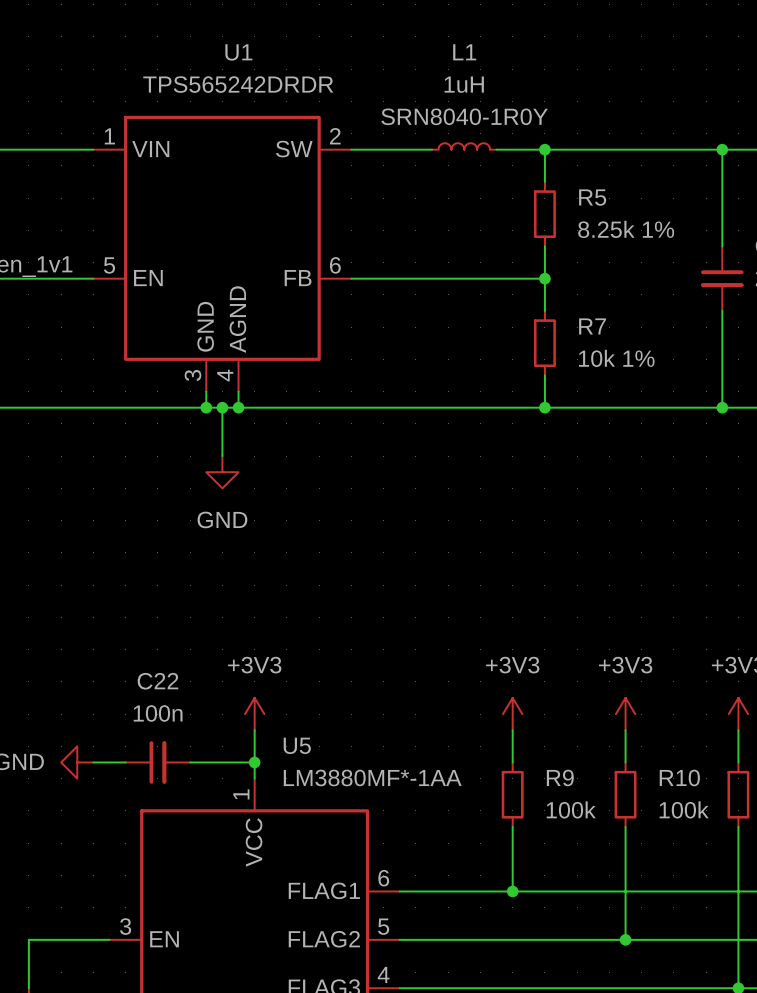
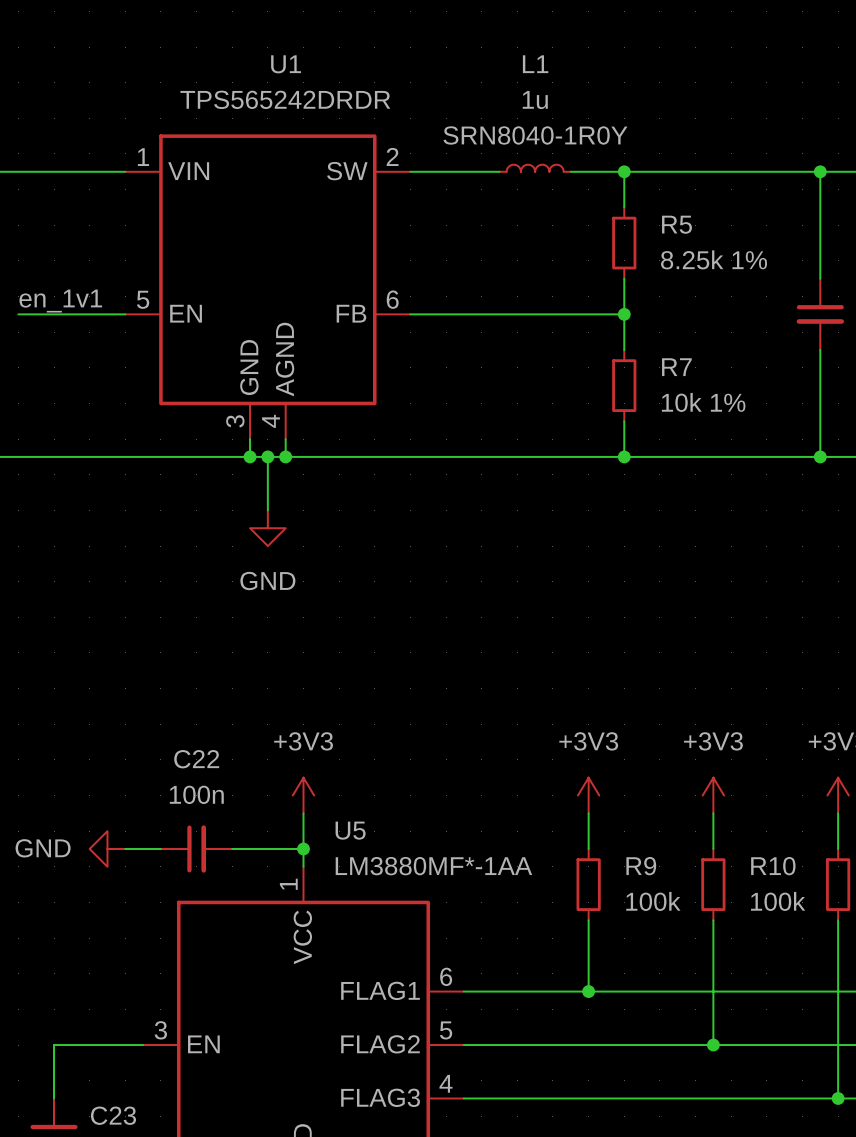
L1 value: 1uH (464, 84) -> 1u (535, 99)

